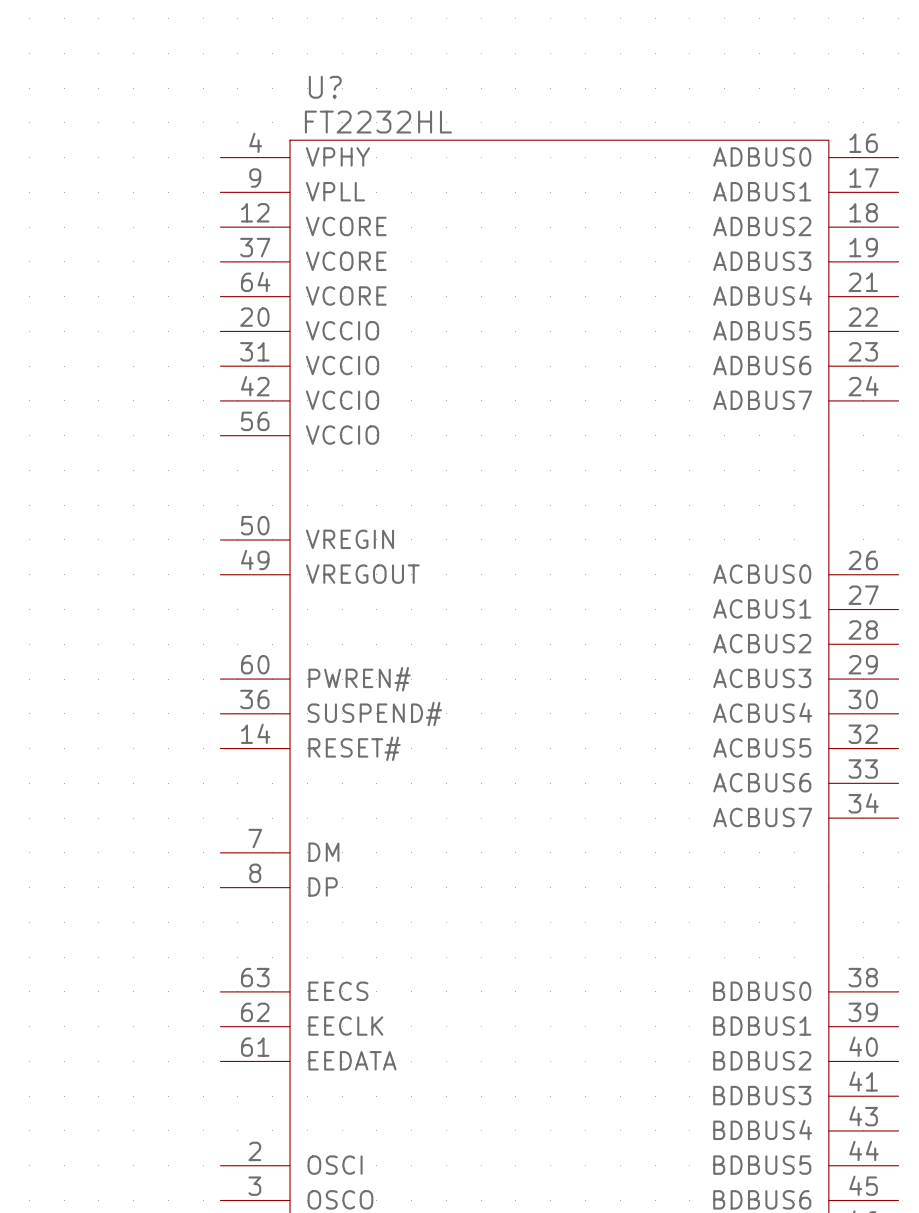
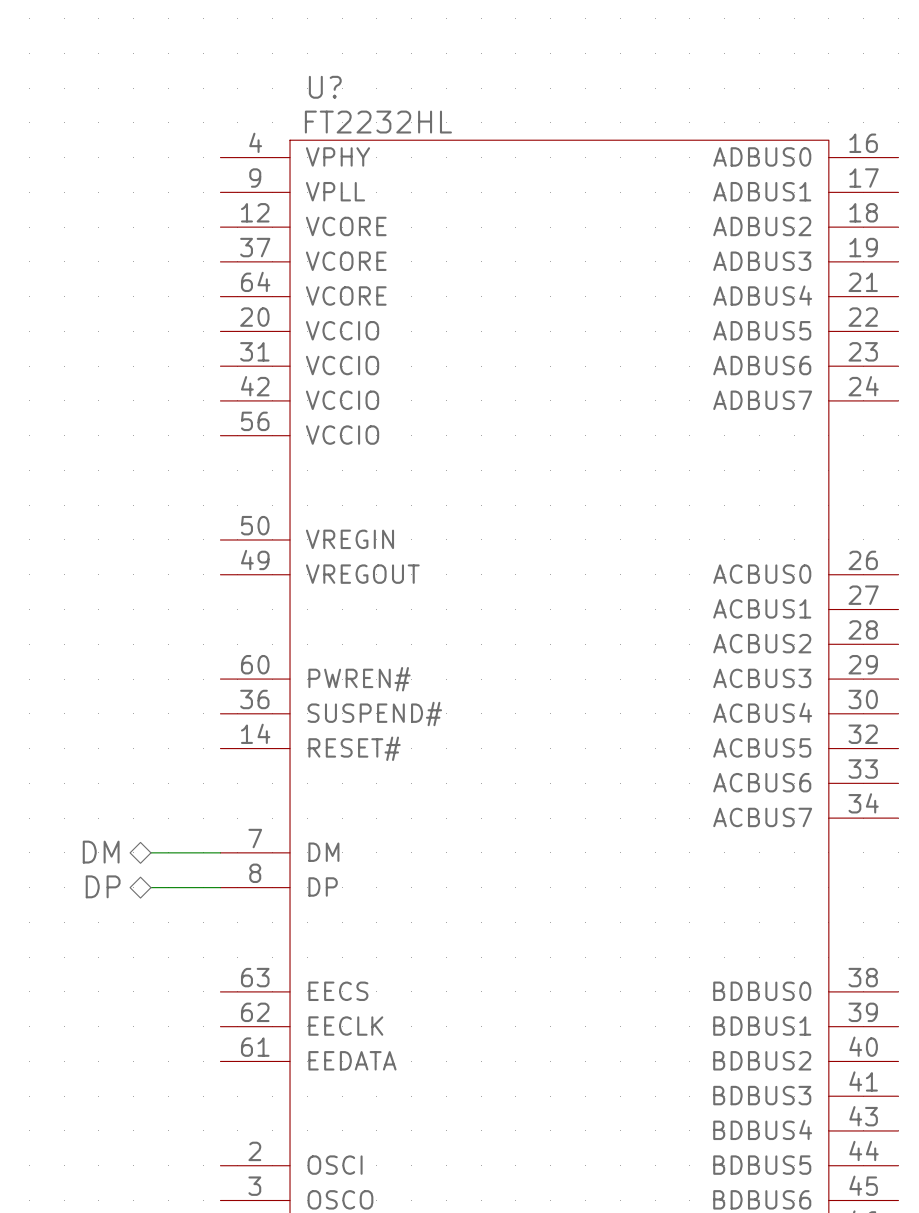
hierarchical label: none -> DM (101, 852)
wire: none -> (150, 852) (220, 852)
hierarchical label: none -> DP (103, 886)
wire: none -> (150, 887) (220, 887)

